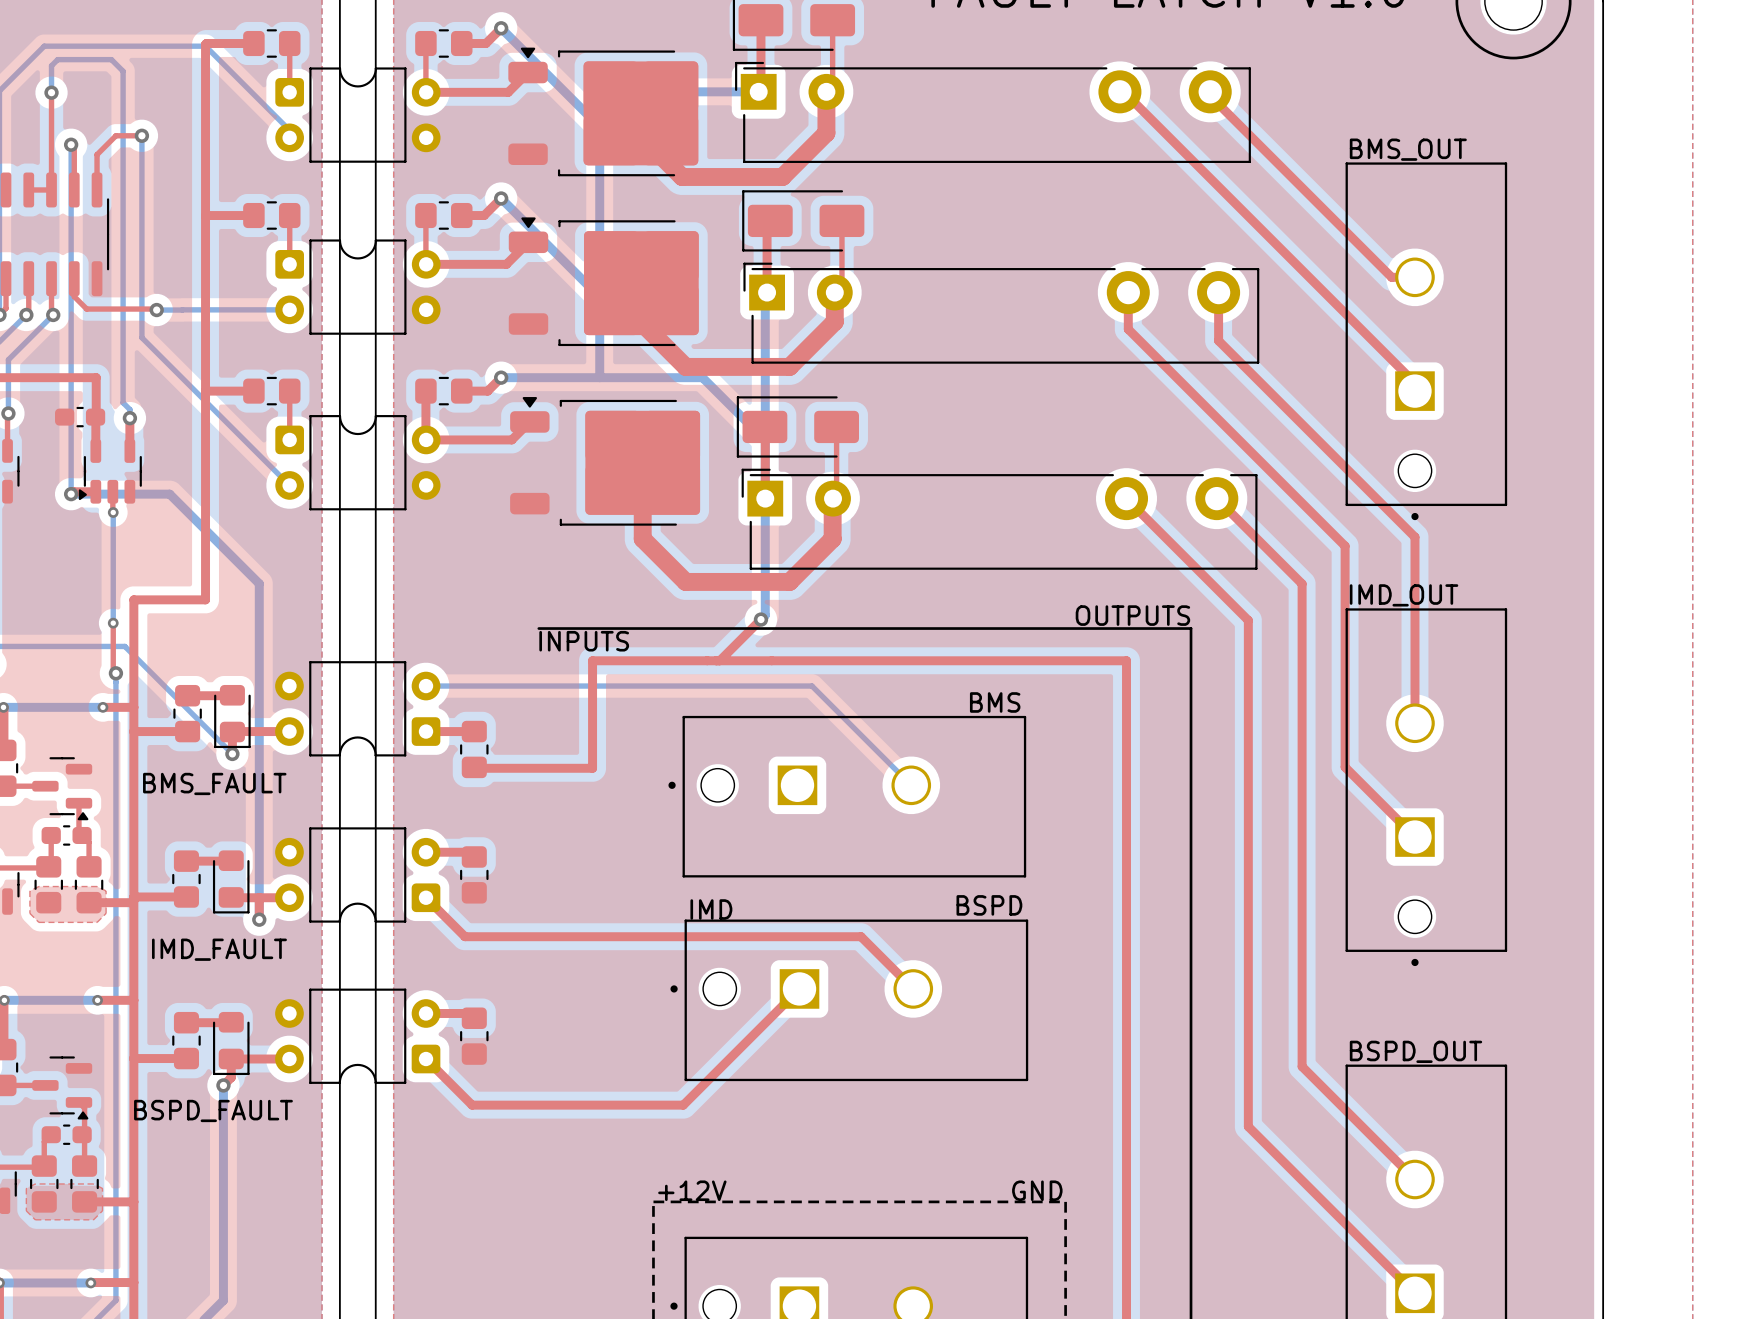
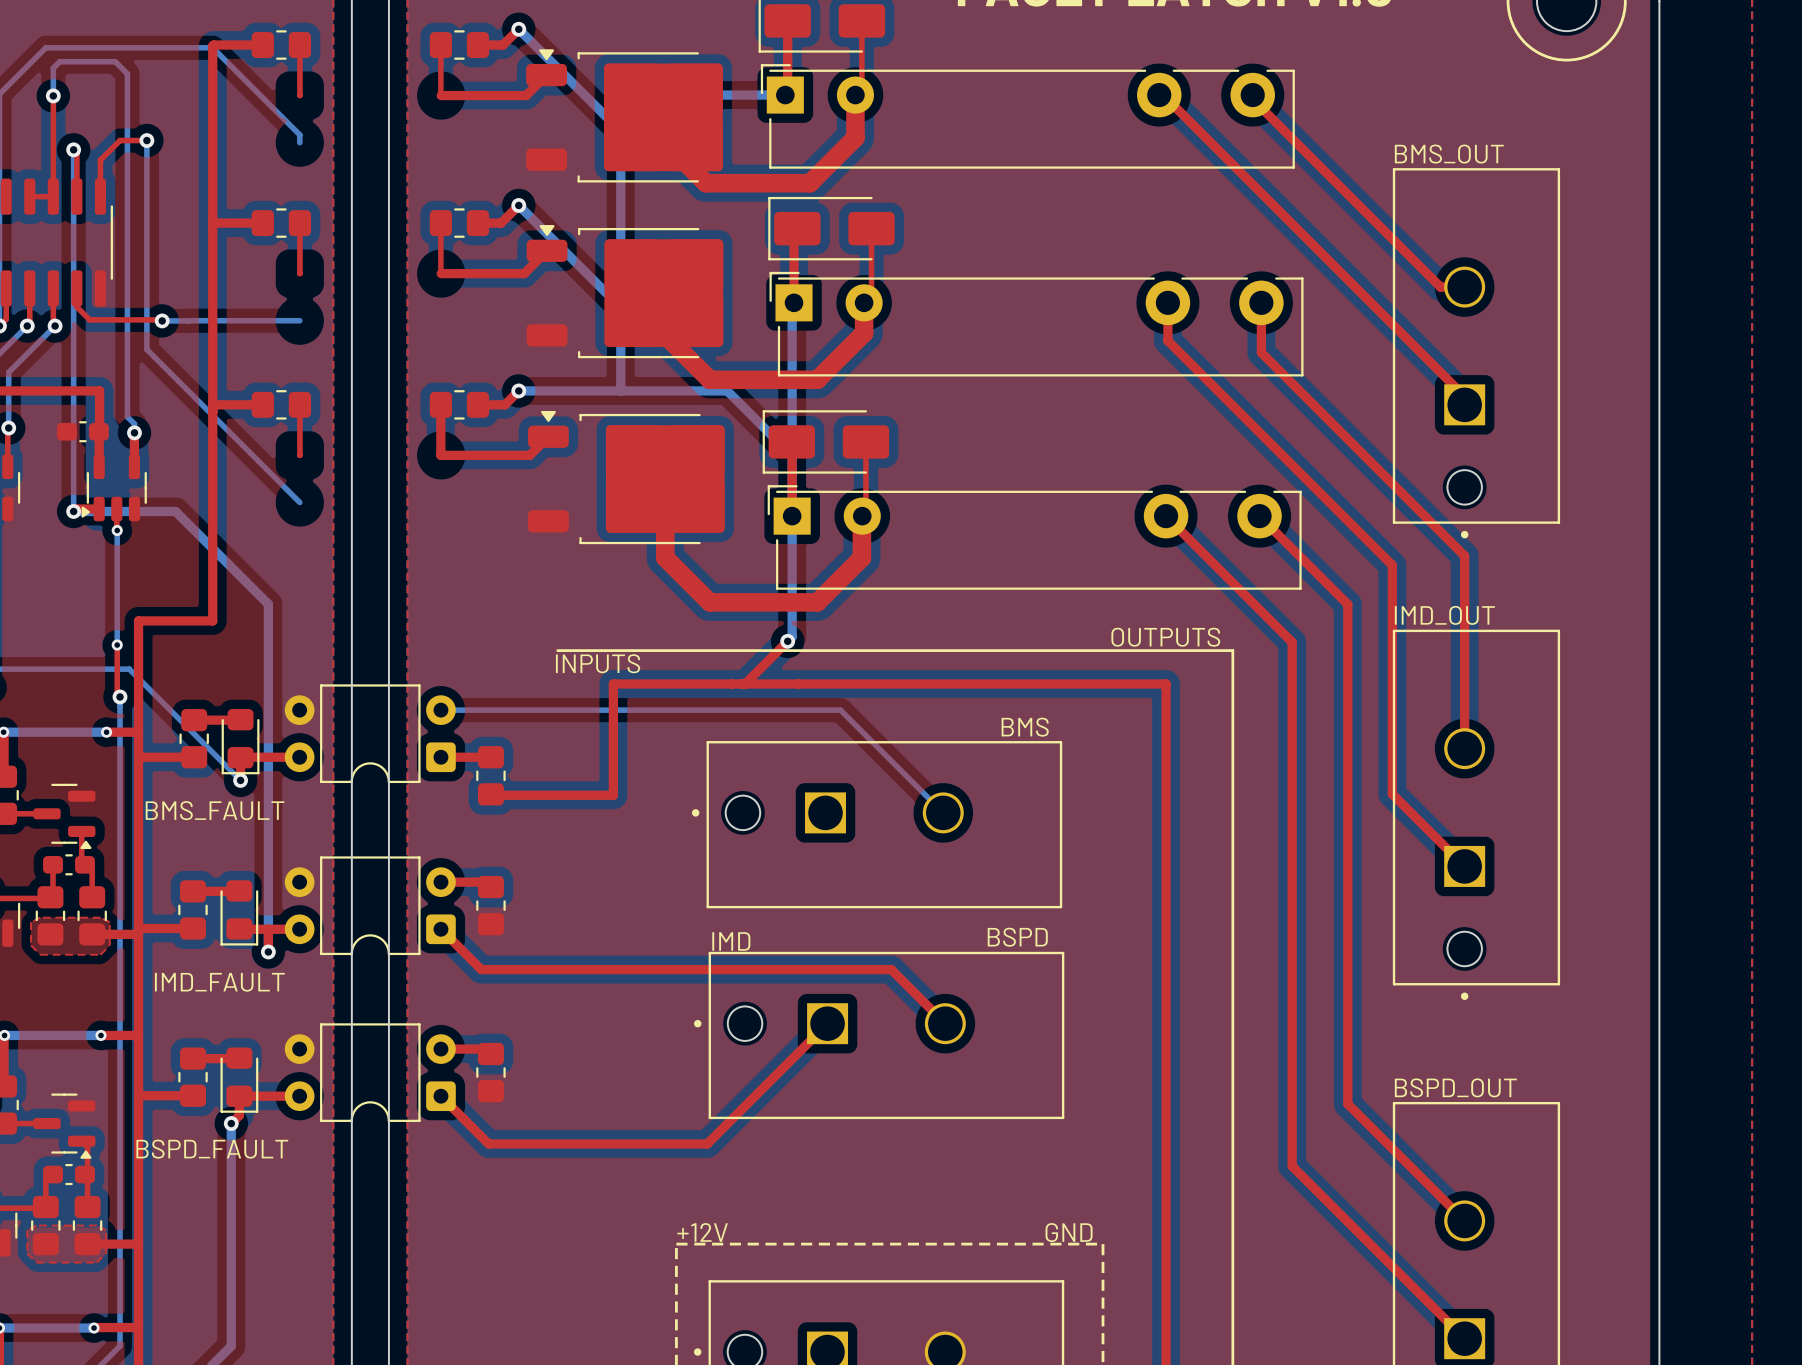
part: (357, 115) -> none
part: (357, 287) -> none
part: (357, 462) -> none

